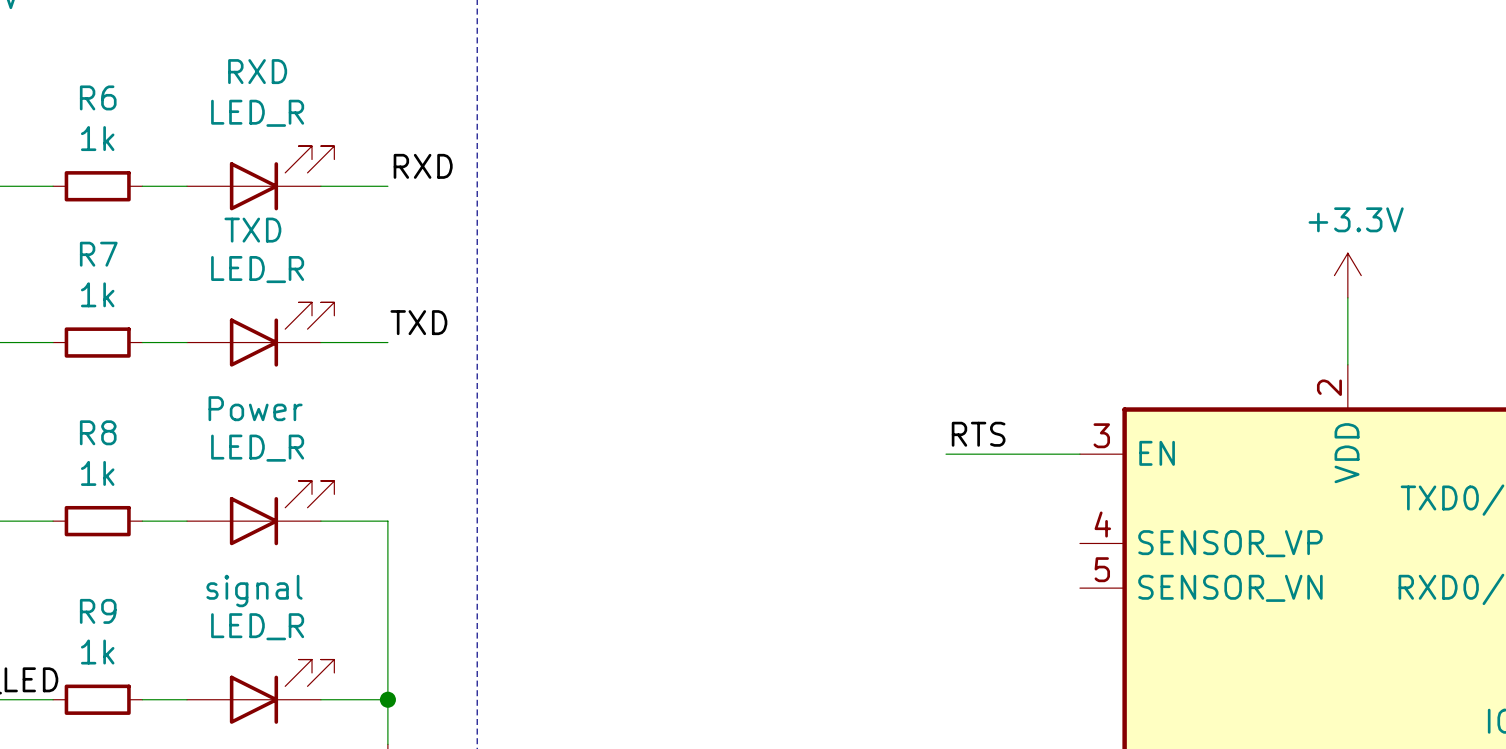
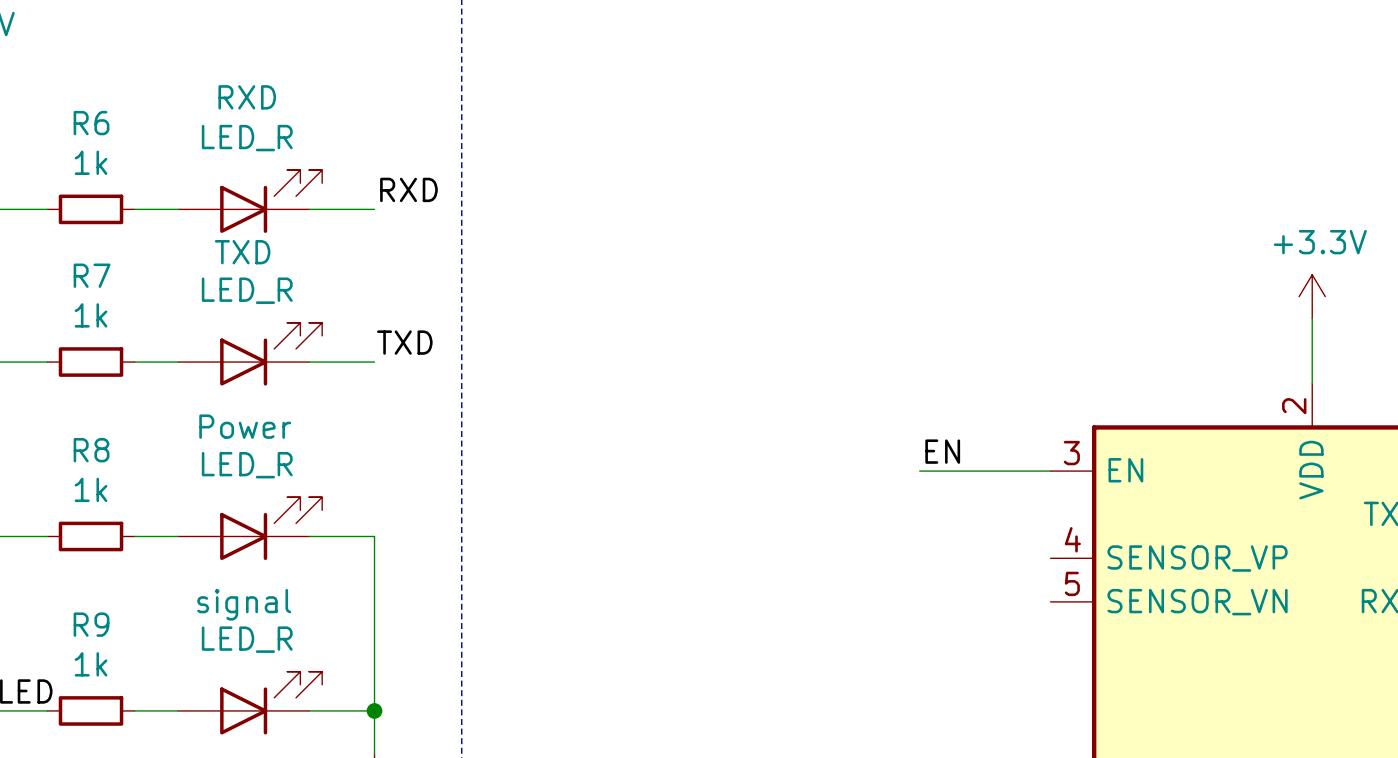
label: RTS (978, 434) -> EN (942, 451)

